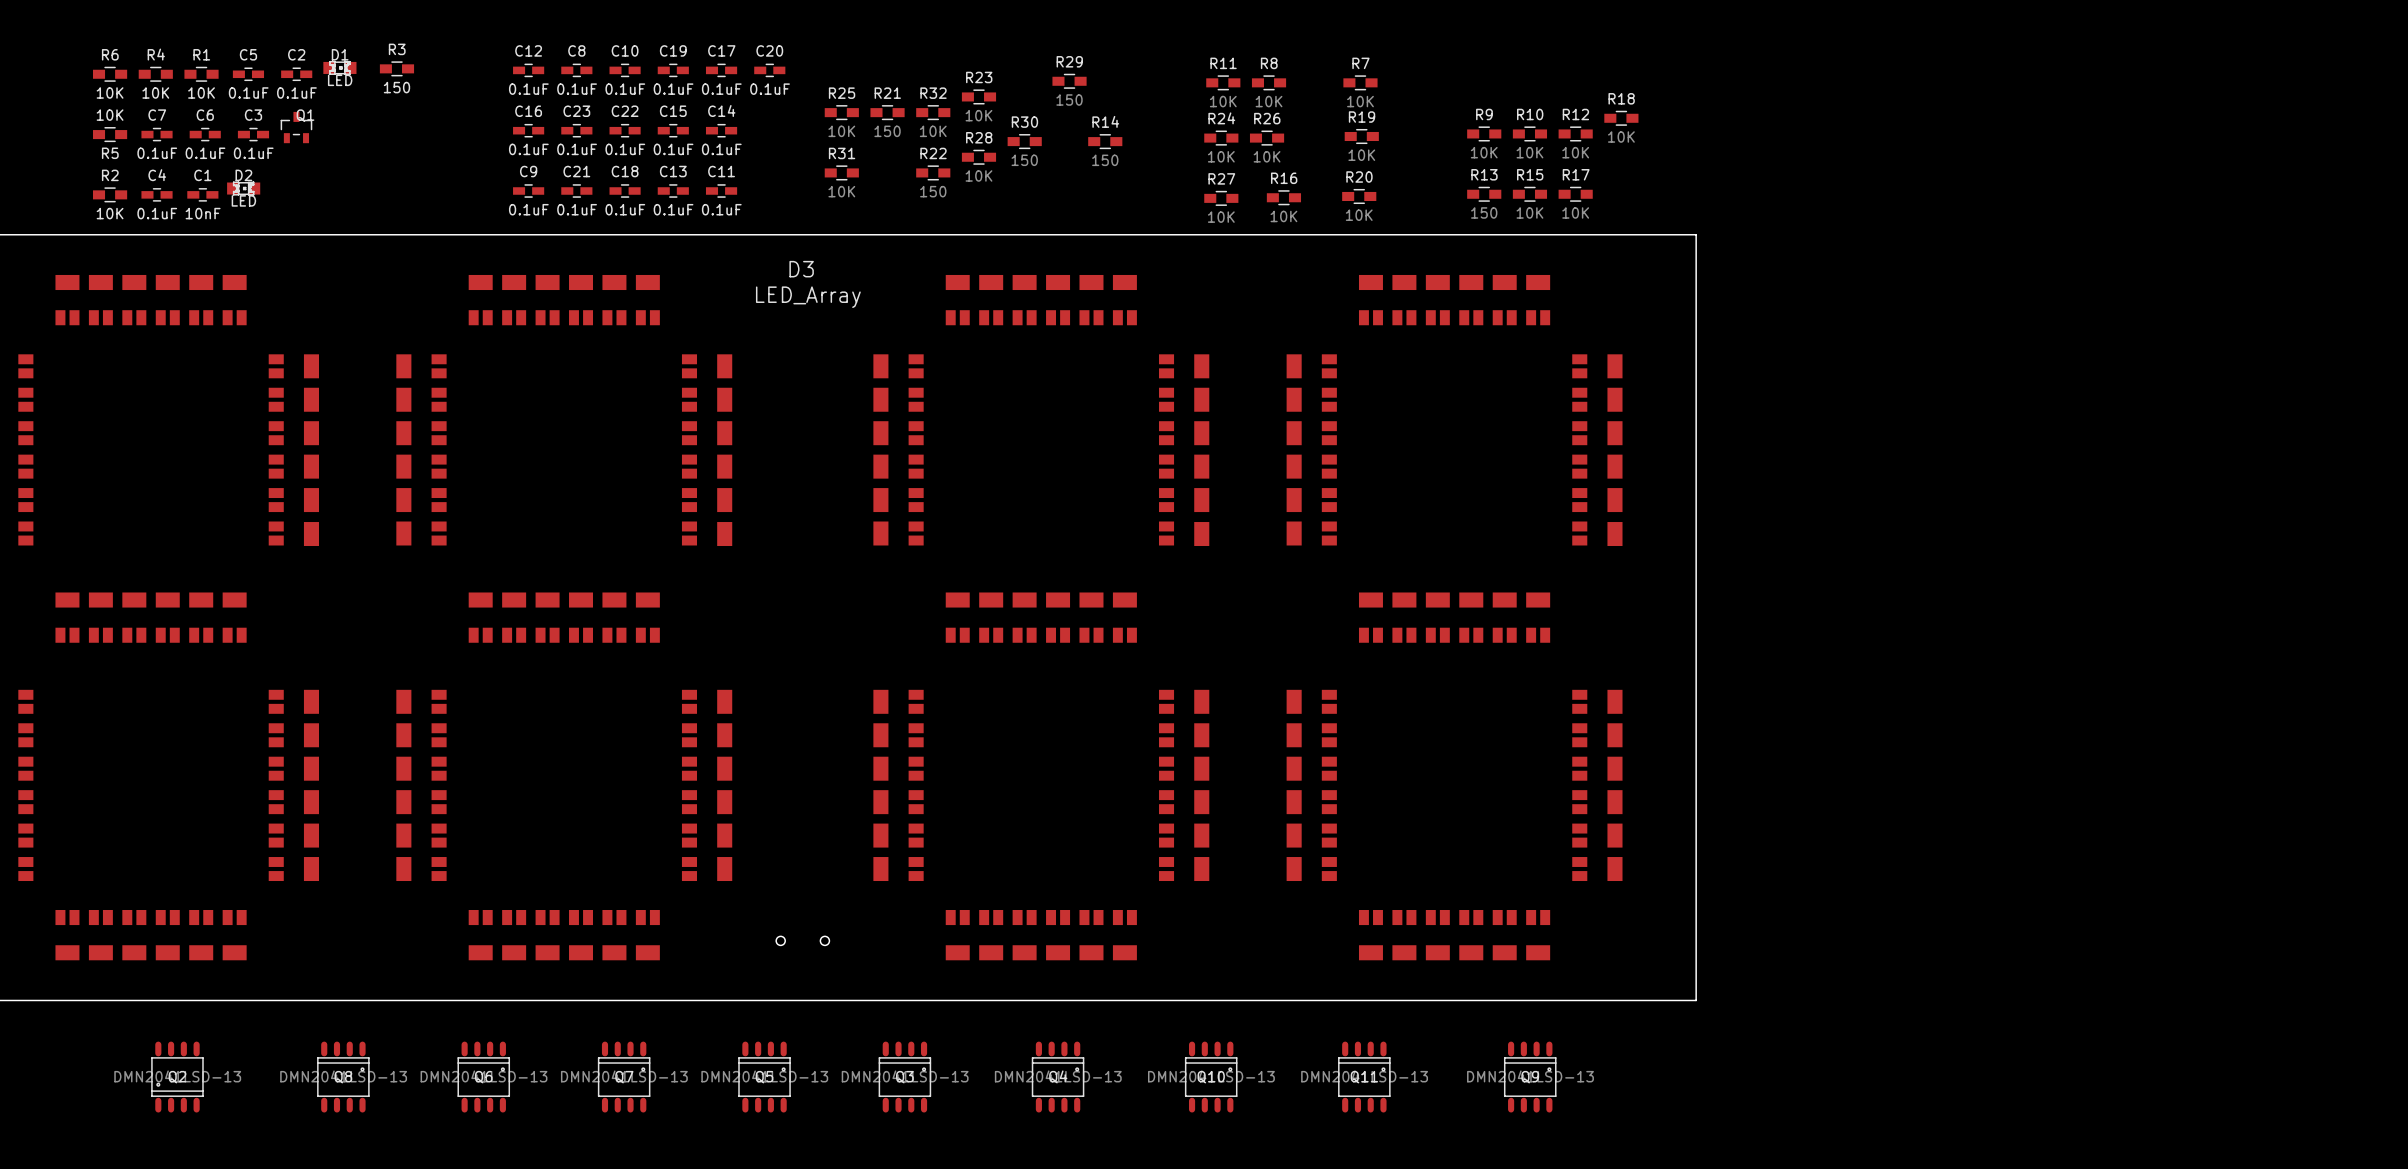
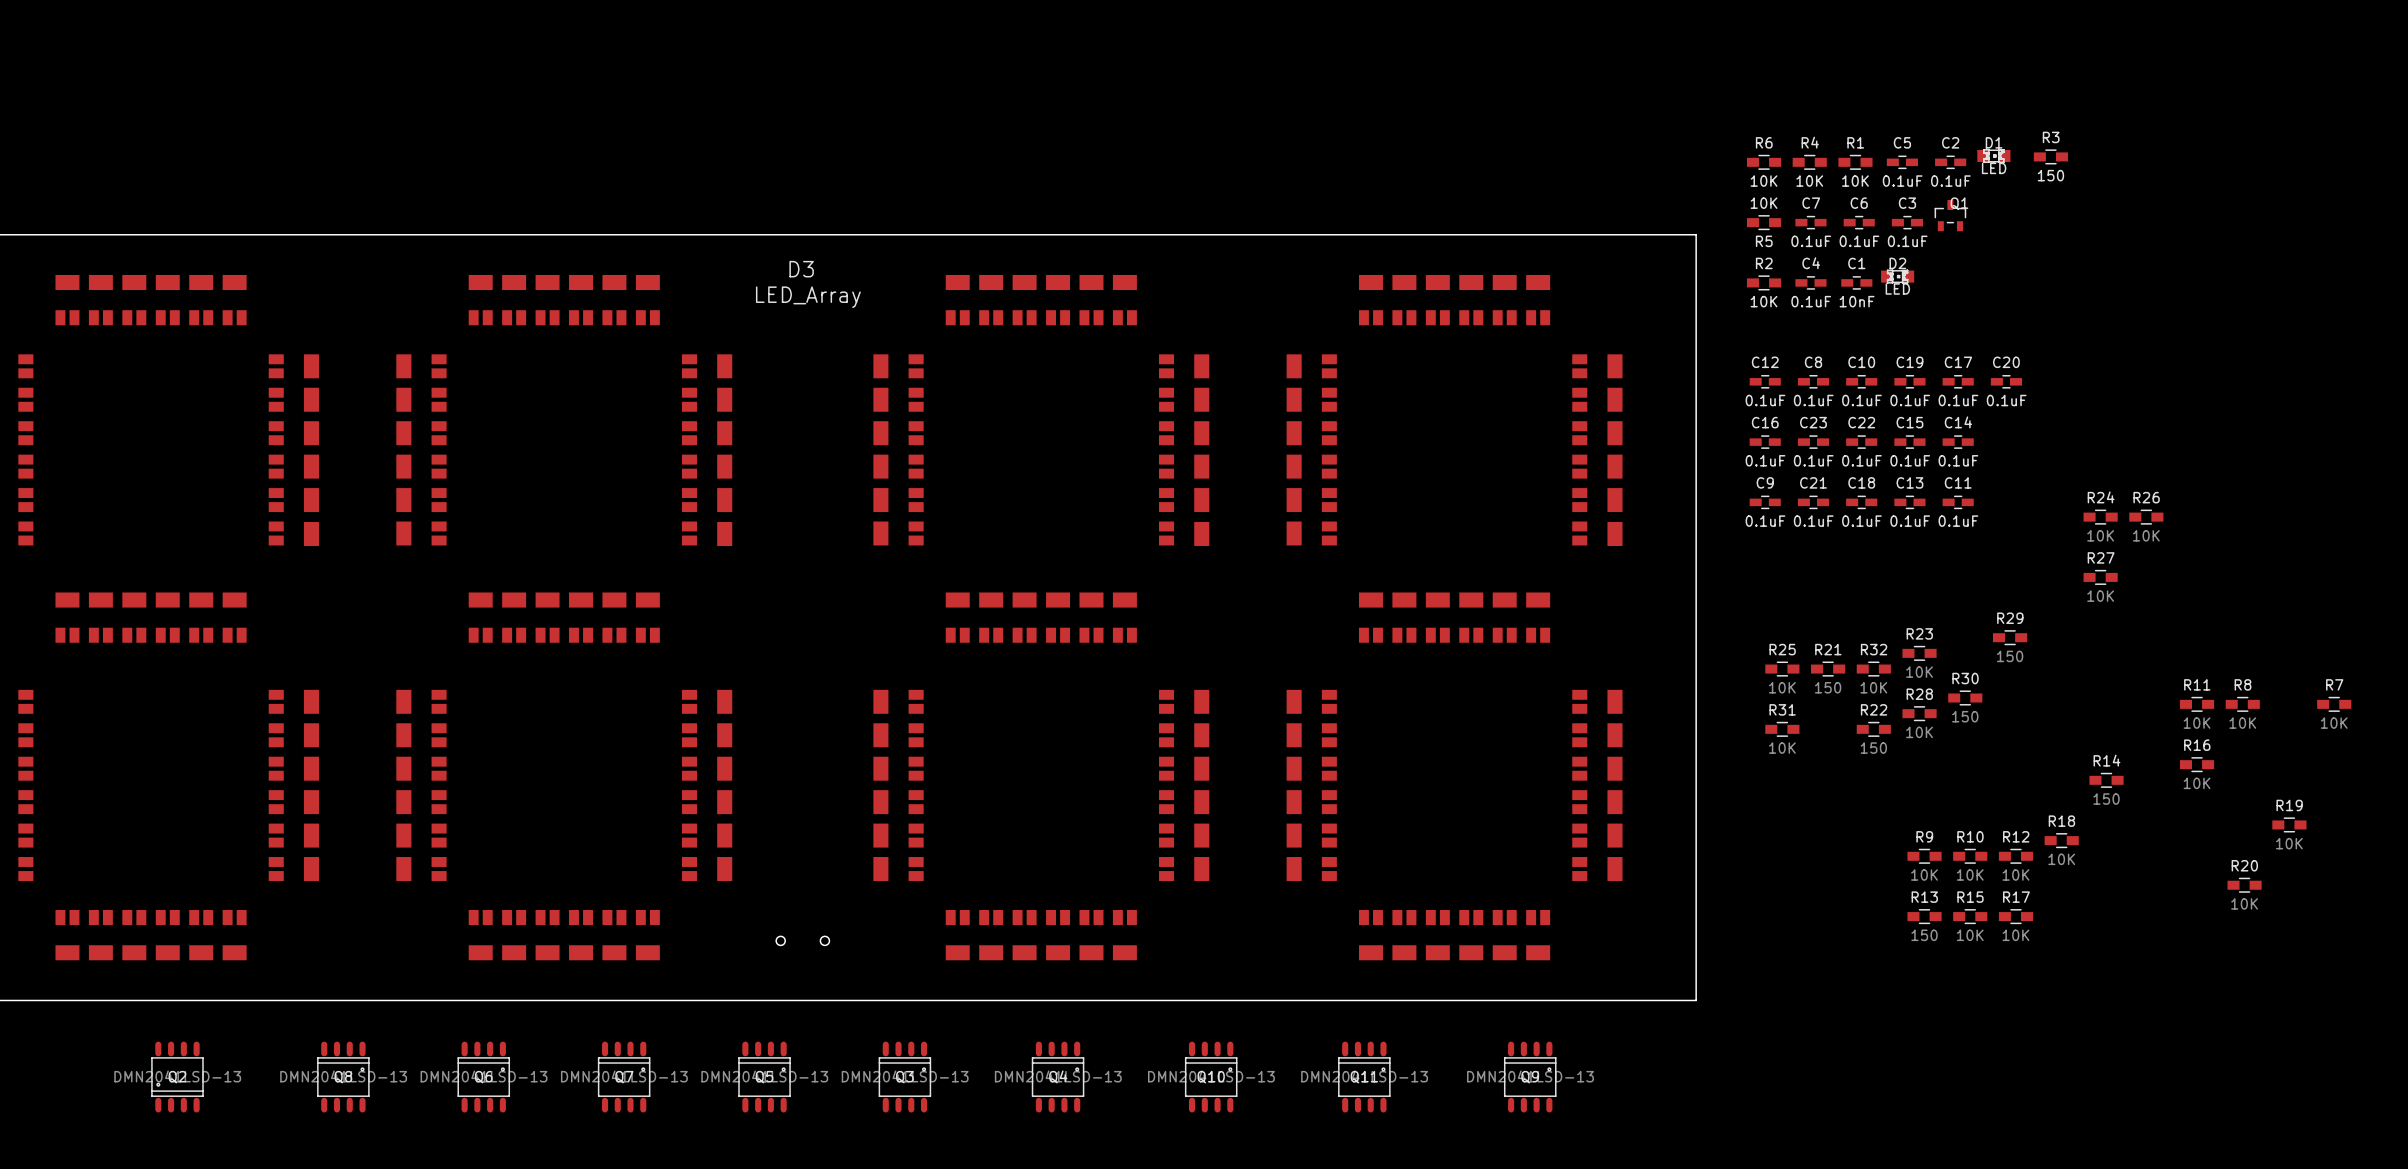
D1 position: (339, 67) -> (1993, 156)
R3 position: (396, 68) -> (2050, 156)
C12 position: (528, 70) -> (1765, 381)
C8 position: (576, 70) -> (1813, 381)
C10 position: (625, 70) -> (1861, 381)
C19 position: (673, 70) -> (1909, 381)
C17 position: (721, 70) -> (1958, 381)
C20 position: (769, 70) -> (2006, 381)
R6 position: (110, 74) -> (1764, 162)
R4 position: (155, 74) -> (1809, 162)
R1 position: (201, 74) -> (1855, 162)
C5 position: (248, 74) -> (1902, 162)
C2 position: (296, 74) -> (1950, 162)
R29 position: (1069, 81) -> (2010, 637)
R11 position: (1223, 82) -> (2197, 704)
R8 position: (1269, 82) -> (2242, 704)
R7 position: (1360, 82) -> (2334, 704)
R23 position: (978, 96) -> (1919, 653)
R25 position: (841, 112) -> (1782, 669)
R21 position: (887, 112) -> (1828, 669)
R32 position: (933, 112) -> (1873, 669)
R18 position: (1621, 118) -> (2061, 840)
Q1 position: (296, 127) -> (1950, 215)
C16 position: (528, 130) -> (1765, 442)
C23 position: (576, 130) -> (1813, 442)
C22 position: (625, 130) -> (1861, 442)
C15 position: (673, 130) -> (1909, 442)
C14 position: (721, 130) -> (1958, 442)
R9 position: (1484, 133) -> (1924, 856)
R10 position: (1529, 133) -> (1970, 856)
R12 position: (1575, 133) -> (2015, 856)
R5 position: (110, 134) -> (1764, 222)
C7 position: (157, 134) -> (1810, 222)
C6 position: (205, 134) -> (1859, 222)
C3 position: (253, 134) -> (1907, 222)
R19 position: (1361, 136) -> (2289, 824)
R24 position: (1221, 138) -> (2100, 517)
R26 position: (1267, 138) -> (2146, 517)
R30 position: (1024, 141) -> (1965, 697)
R14 position: (1105, 141) -> (2106, 780)
R28 position: (978, 157) -> (1919, 713)
R31 position: (841, 172) -> (1782, 729)
R22 position: (933, 172) -> (1873, 729)
D2 position: (243, 188) -> (1897, 276)
C9 position: (528, 190) -> (1765, 502)
C21 position: (576, 190) -> (1813, 502)
C18 position: (625, 190) -> (1861, 502)
C13 position: (673, 190) -> (1909, 502)
C11 position: (721, 190) -> (1958, 502)
R2 position: (110, 194) -> (1764, 282)
C4 position: (157, 194) -> (1810, 282)
C1 position: (202, 194) -> (1856, 282)
R13 position: (1484, 194) -> (1924, 916)
R15 position: (1529, 194) -> (1970, 916)
R17 position: (1575, 194) -> (2015, 916)
R20 position: (1359, 196) -> (2244, 885)
R16 position: (1283, 197) -> (2197, 764)
R27 position: (1221, 198) -> (2100, 577)

